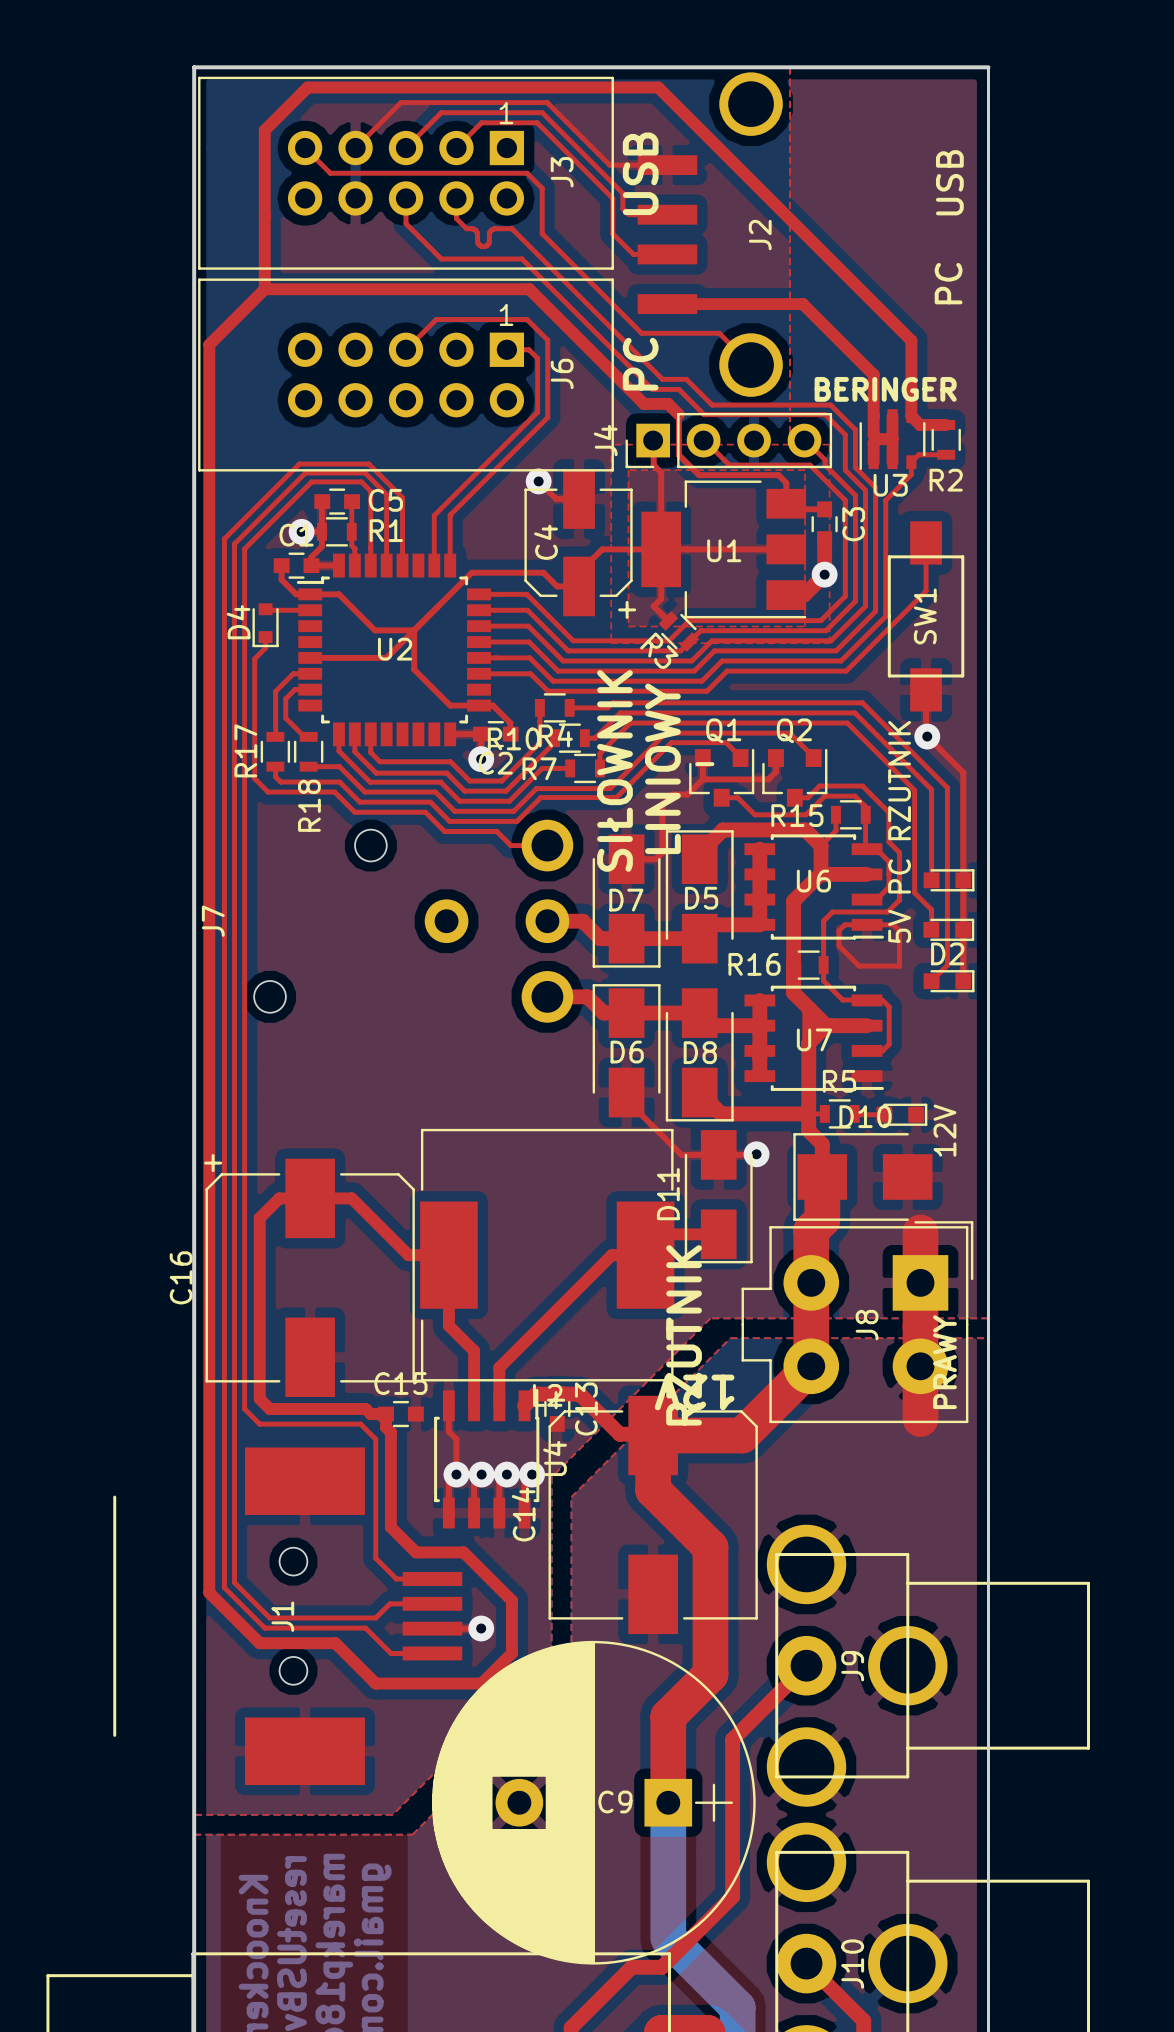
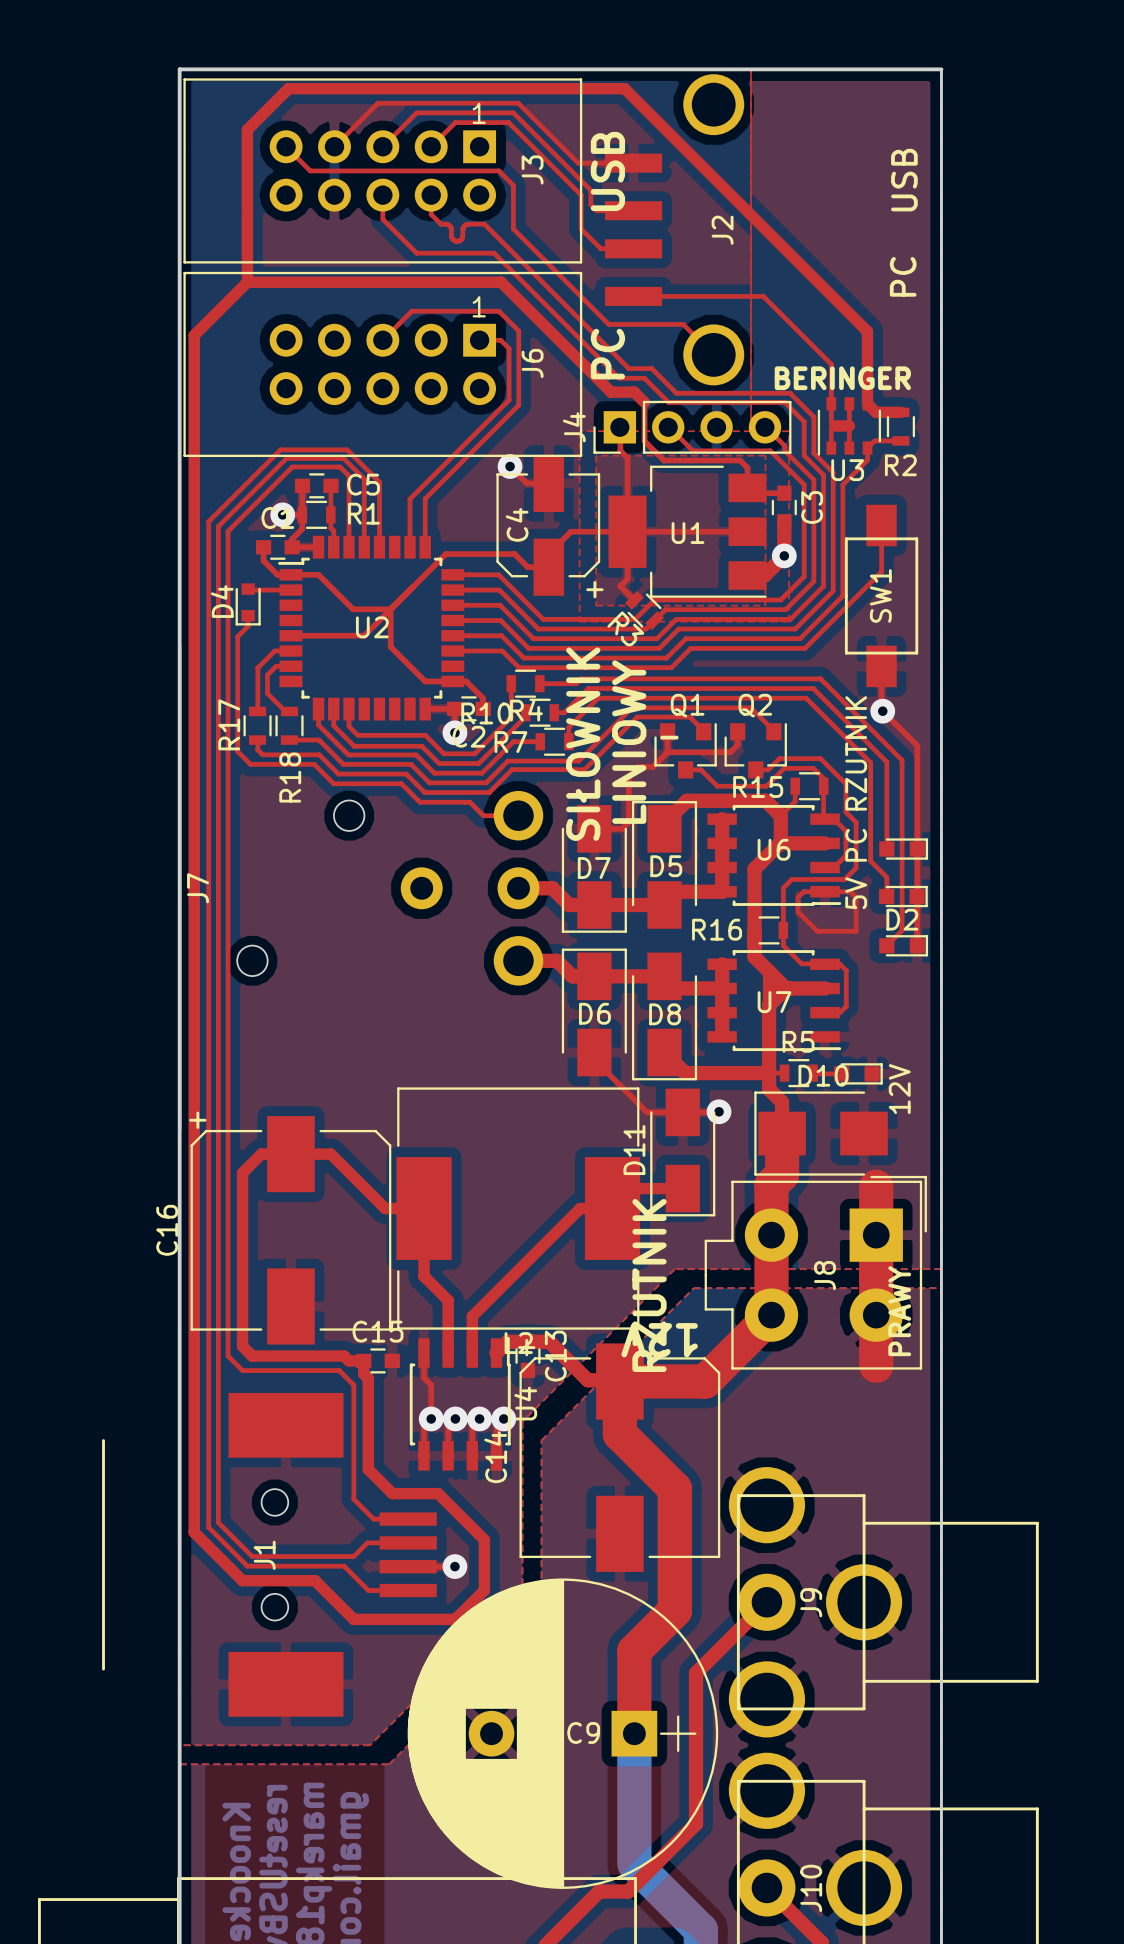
top track width: thick (667, 304) (802, 304) (873, 374) (873, 435) (877, 439) (873, 442) (873, 462) -> thin (633, 296) (763, 296) (831, 364) (831, 422) (834, 425) (831, 429) (831, 448)
top track width: thick (892, 416) (892, 462) -> thin (849, 403) (849, 448)

